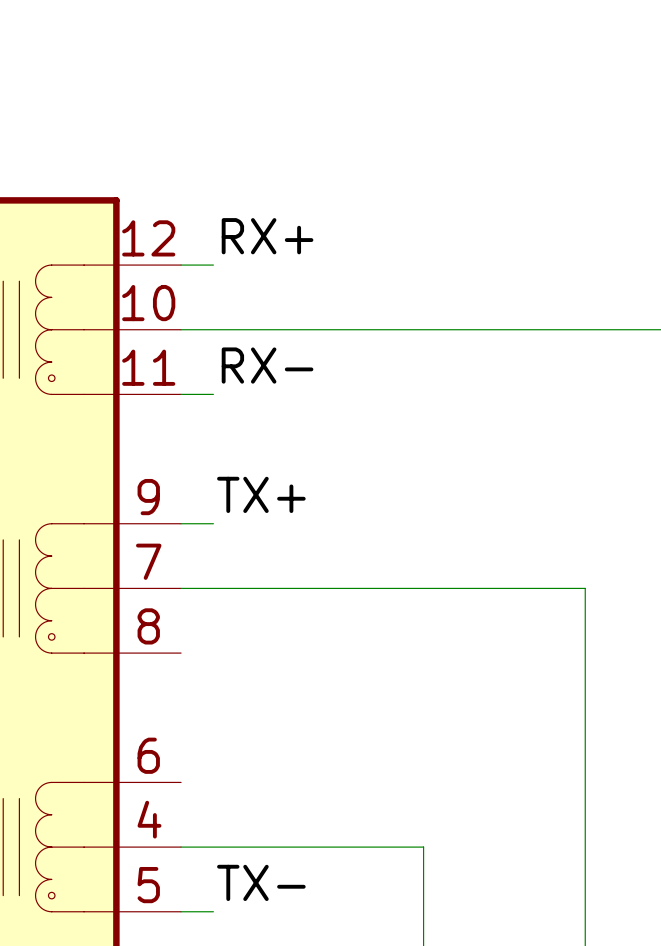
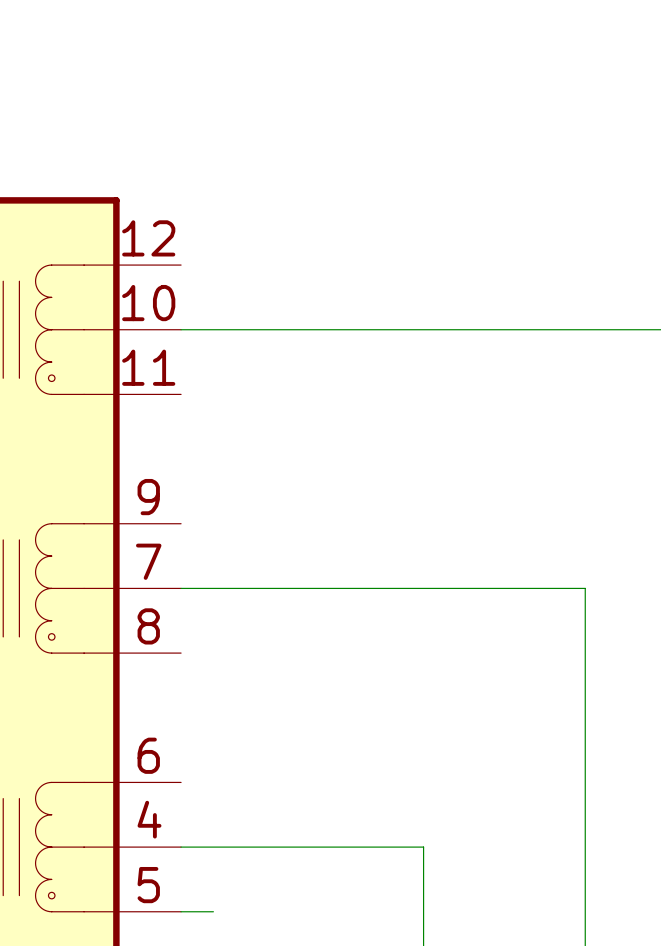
label: RX+ (267, 236) -> none
wire: (181, 265) (213, 265) -> none
label: RX- (267, 365) -> none
wire: (181, 394) (213, 394) -> none
label: TX+ (261, 494) -> none
wire: (181, 523) (213, 523) -> none
label: TX- (261, 882) -> none

